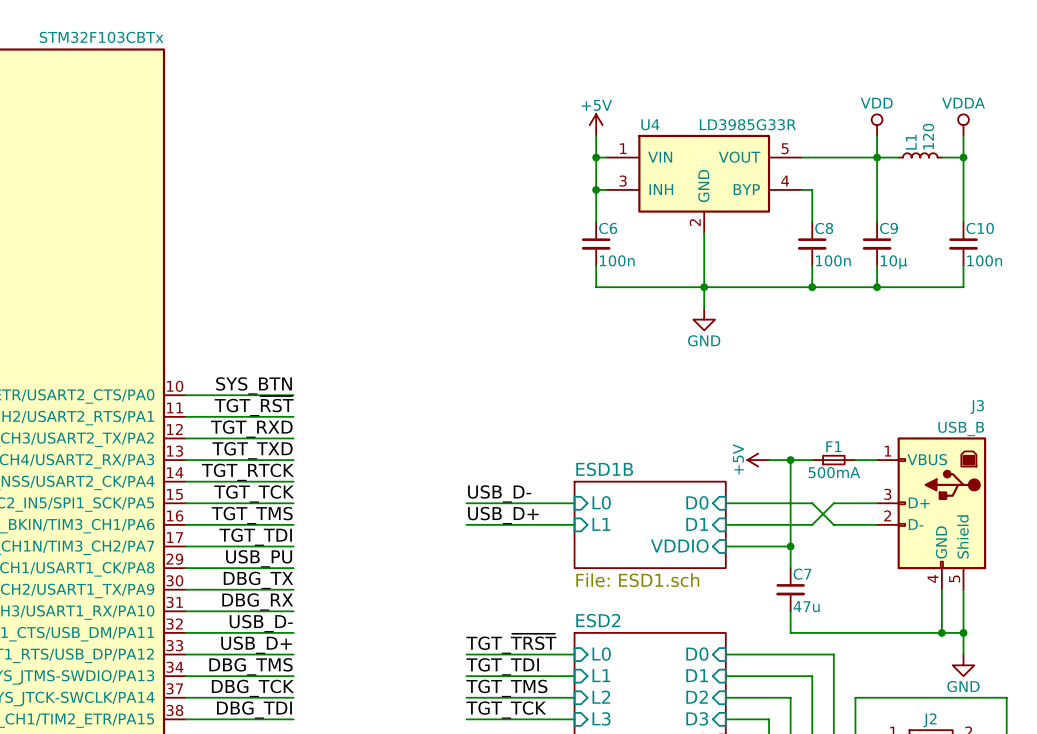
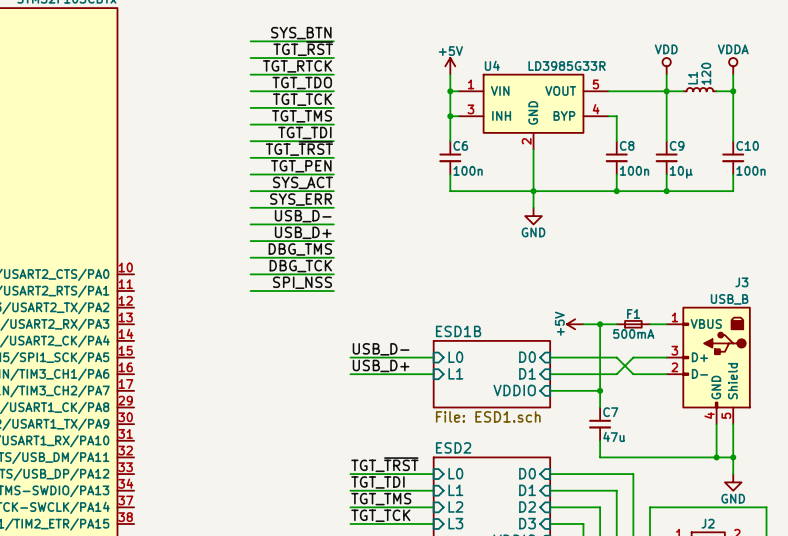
label: none -> SYS_BTN (301, 33)
wire: none -> (250, 41) (333, 41)
label: none -> TGT_~{RST} (303, 48)
wire: none -> (250, 58) (333, 58)
label: none -> TGT_RTCK (297, 66)
wire: none -> (250, 74) (333, 74)
label: none -> TGT_TDO (302, 83)
wire: none -> (250, 91) (333, 91)
label: none -> TGT_TCK (302, 99)
wire: none -> (250, 107) (333, 107)
label: none -> TGT_TMS (302, 116)
wire: none -> (250, 124) (333, 124)
label: none -> TGT_TDI (304, 132)
wire: none -> (250, 141) (333, 141)
label: none -> TGT_~{TRST} (299, 148)
wire: none -> (250, 157) (333, 157)
label: none -> TGT_PEN (301, 166)
label: none -> SYS_ACT (302, 182)
label: none -> SYS_ERR (301, 199)
label: none -> USB_D- (303, 216)
label: none -> USB_D+ (303, 232)
label: none -> DBG_TMS (300, 249)
label: SYS_BTN (254, 385) -> none
label: none -> DBG_TCK (300, 266)
wire: (185, 395) (293, 395) -> (250, 174) (333, 174)
label: TGT_~{RST} (254, 406) -> none
label: none -> SPI_NSS (302, 282)
wire: (185, 416) (293, 416) -> (250, 191) (333, 191)
label: TGT_RXD (251, 429) -> none
wire: (185, 438) (293, 438) -> (250, 207) (333, 207)
label: TGT_TXD (252, 450) -> none
wire: (185, 460) (293, 460) -> (250, 224) (333, 224)
label: TGT_RTCK (247, 472) -> none
wire: (185, 481) (293, 481) -> (250, 241) (333, 241)
label: TGT_TCK (254, 493) -> none
wire: (185, 503) (293, 503) -> (250, 257) (333, 257)
label: TGT_TMS (252, 515) -> none
wire: (185, 524) (293, 524) -> (250, 274) (333, 274)
label: TGT_TDI (255, 537) -> none
wire: (185, 546) (293, 546) -> (250, 291) (333, 291)
label: USB_PU (259, 558) -> none
wire: (185, 568) (293, 568) -> none
label: DBG_TX (258, 580) -> none
wire: (185, 589) (293, 589) -> none
label: DBG_RX (257, 601) -> none
wire: (185, 611) (293, 611) -> none
label: USB_D- (261, 623) -> none
wire: (185, 632) (293, 632) -> none
label: USB_D+ (256, 645) -> none
wire: (185, 654) (293, 654) -> none
label: DBG_TMS (251, 666) -> none
wire: (185, 676) (293, 676) -> none
label: DBG_TCK (252, 688) -> none
wire: (185, 697) (293, 697) -> none
label: DBG_TDI (254, 710) -> none
wire: (185, 719) (293, 719) -> none

